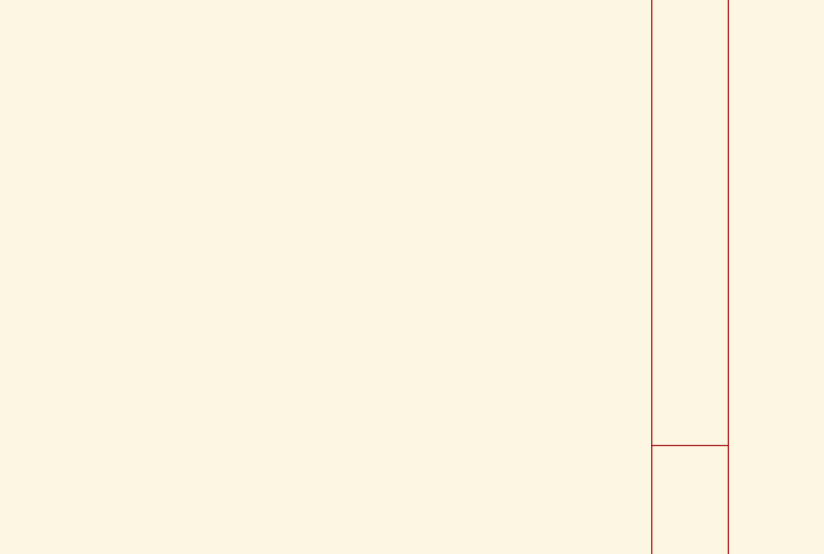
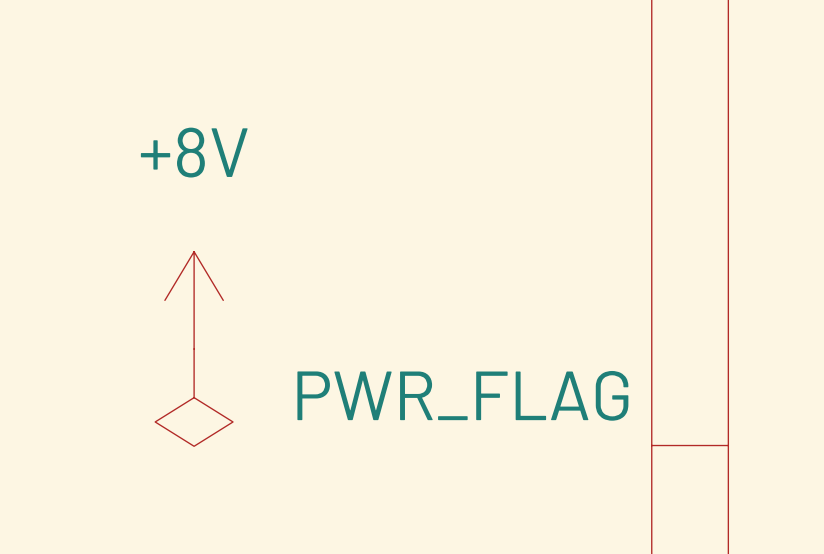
power symbol: none -> +8V (194, 300)
power symbol: none -> PWR_FLAG (194, 397)

